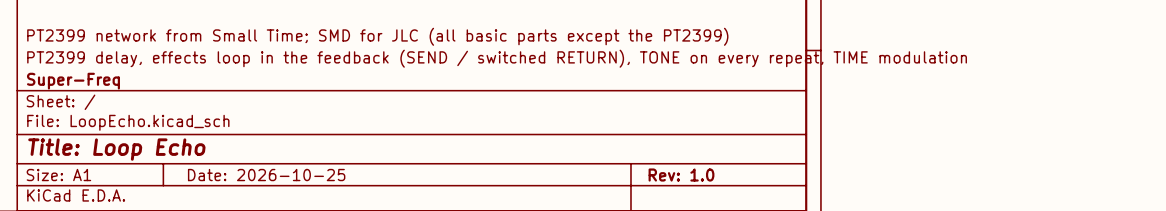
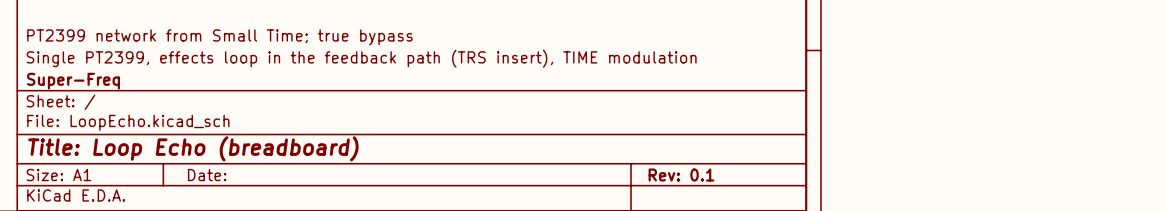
title block: PT2399 network from Small Time; SMD for JLC (all basic parts except the PT2399) (377, 36) -> PT2399 network from Small Time; true bypass (219, 37)
title block: PT2399 delay, effects loop in the feedback (SEND / switched RETURN), TONE on every repeat, TIME modulation (497, 58) -> Single PT2399, effects loop in the feedback path (TRS insert), TIME modulation (361, 58)
title block: Title: Loop Echo (116, 149) -> Title: Loop Echo (breadboard) (193, 148)
title block: Date: 2026-10-25 (266, 175) -> Date: (207, 175)
title block: Rev: 1.0 (681, 175) -> Rev: 0.1 (681, 175)

